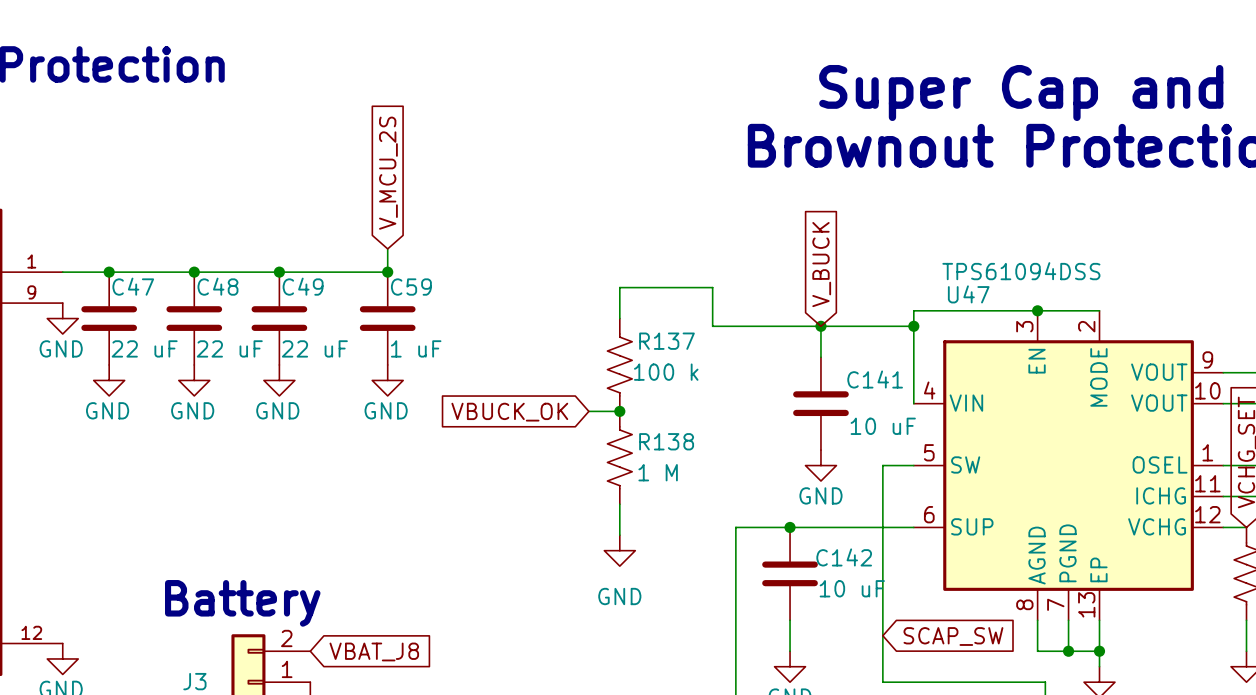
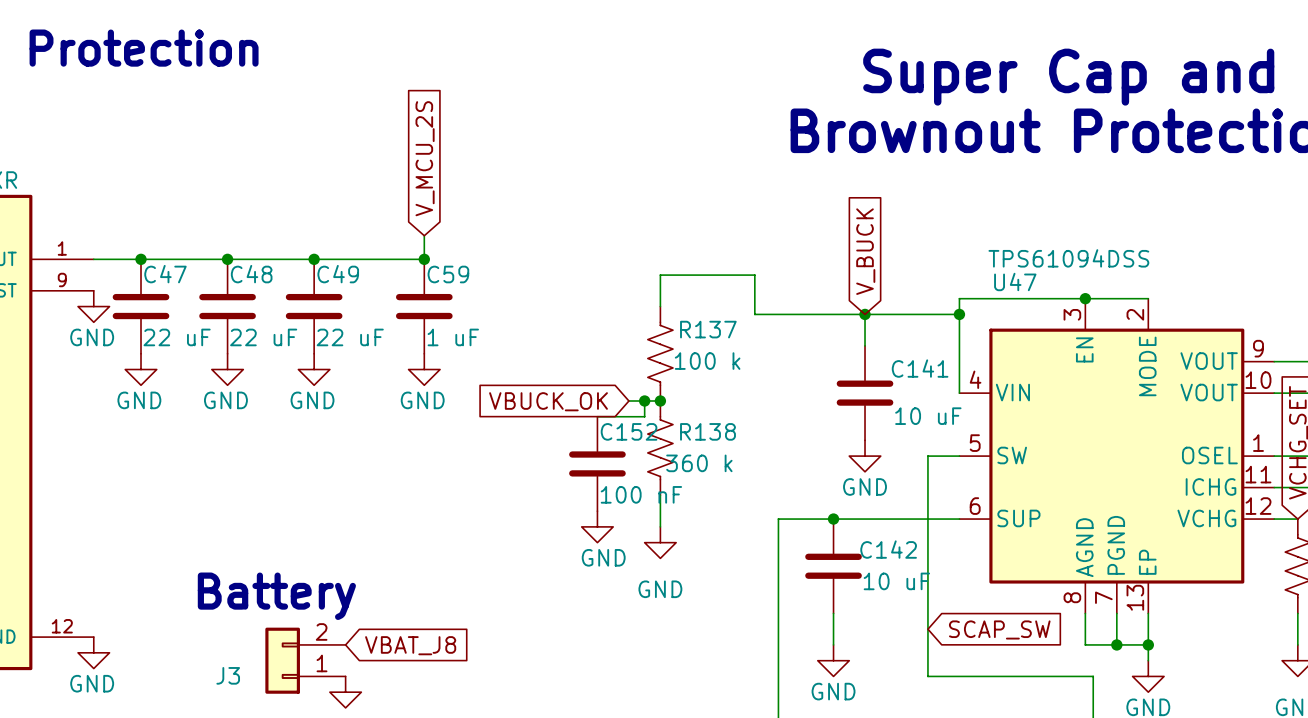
wire: none -> (644, 401) (644, 416) (597, 416)
junction: none -> (644, 401)
R138 value: 1 M (658, 472) -> 360 k (699, 463)
C152: none -> 100 nF (597, 463)
power symbol: none -> GND (597, 526)

